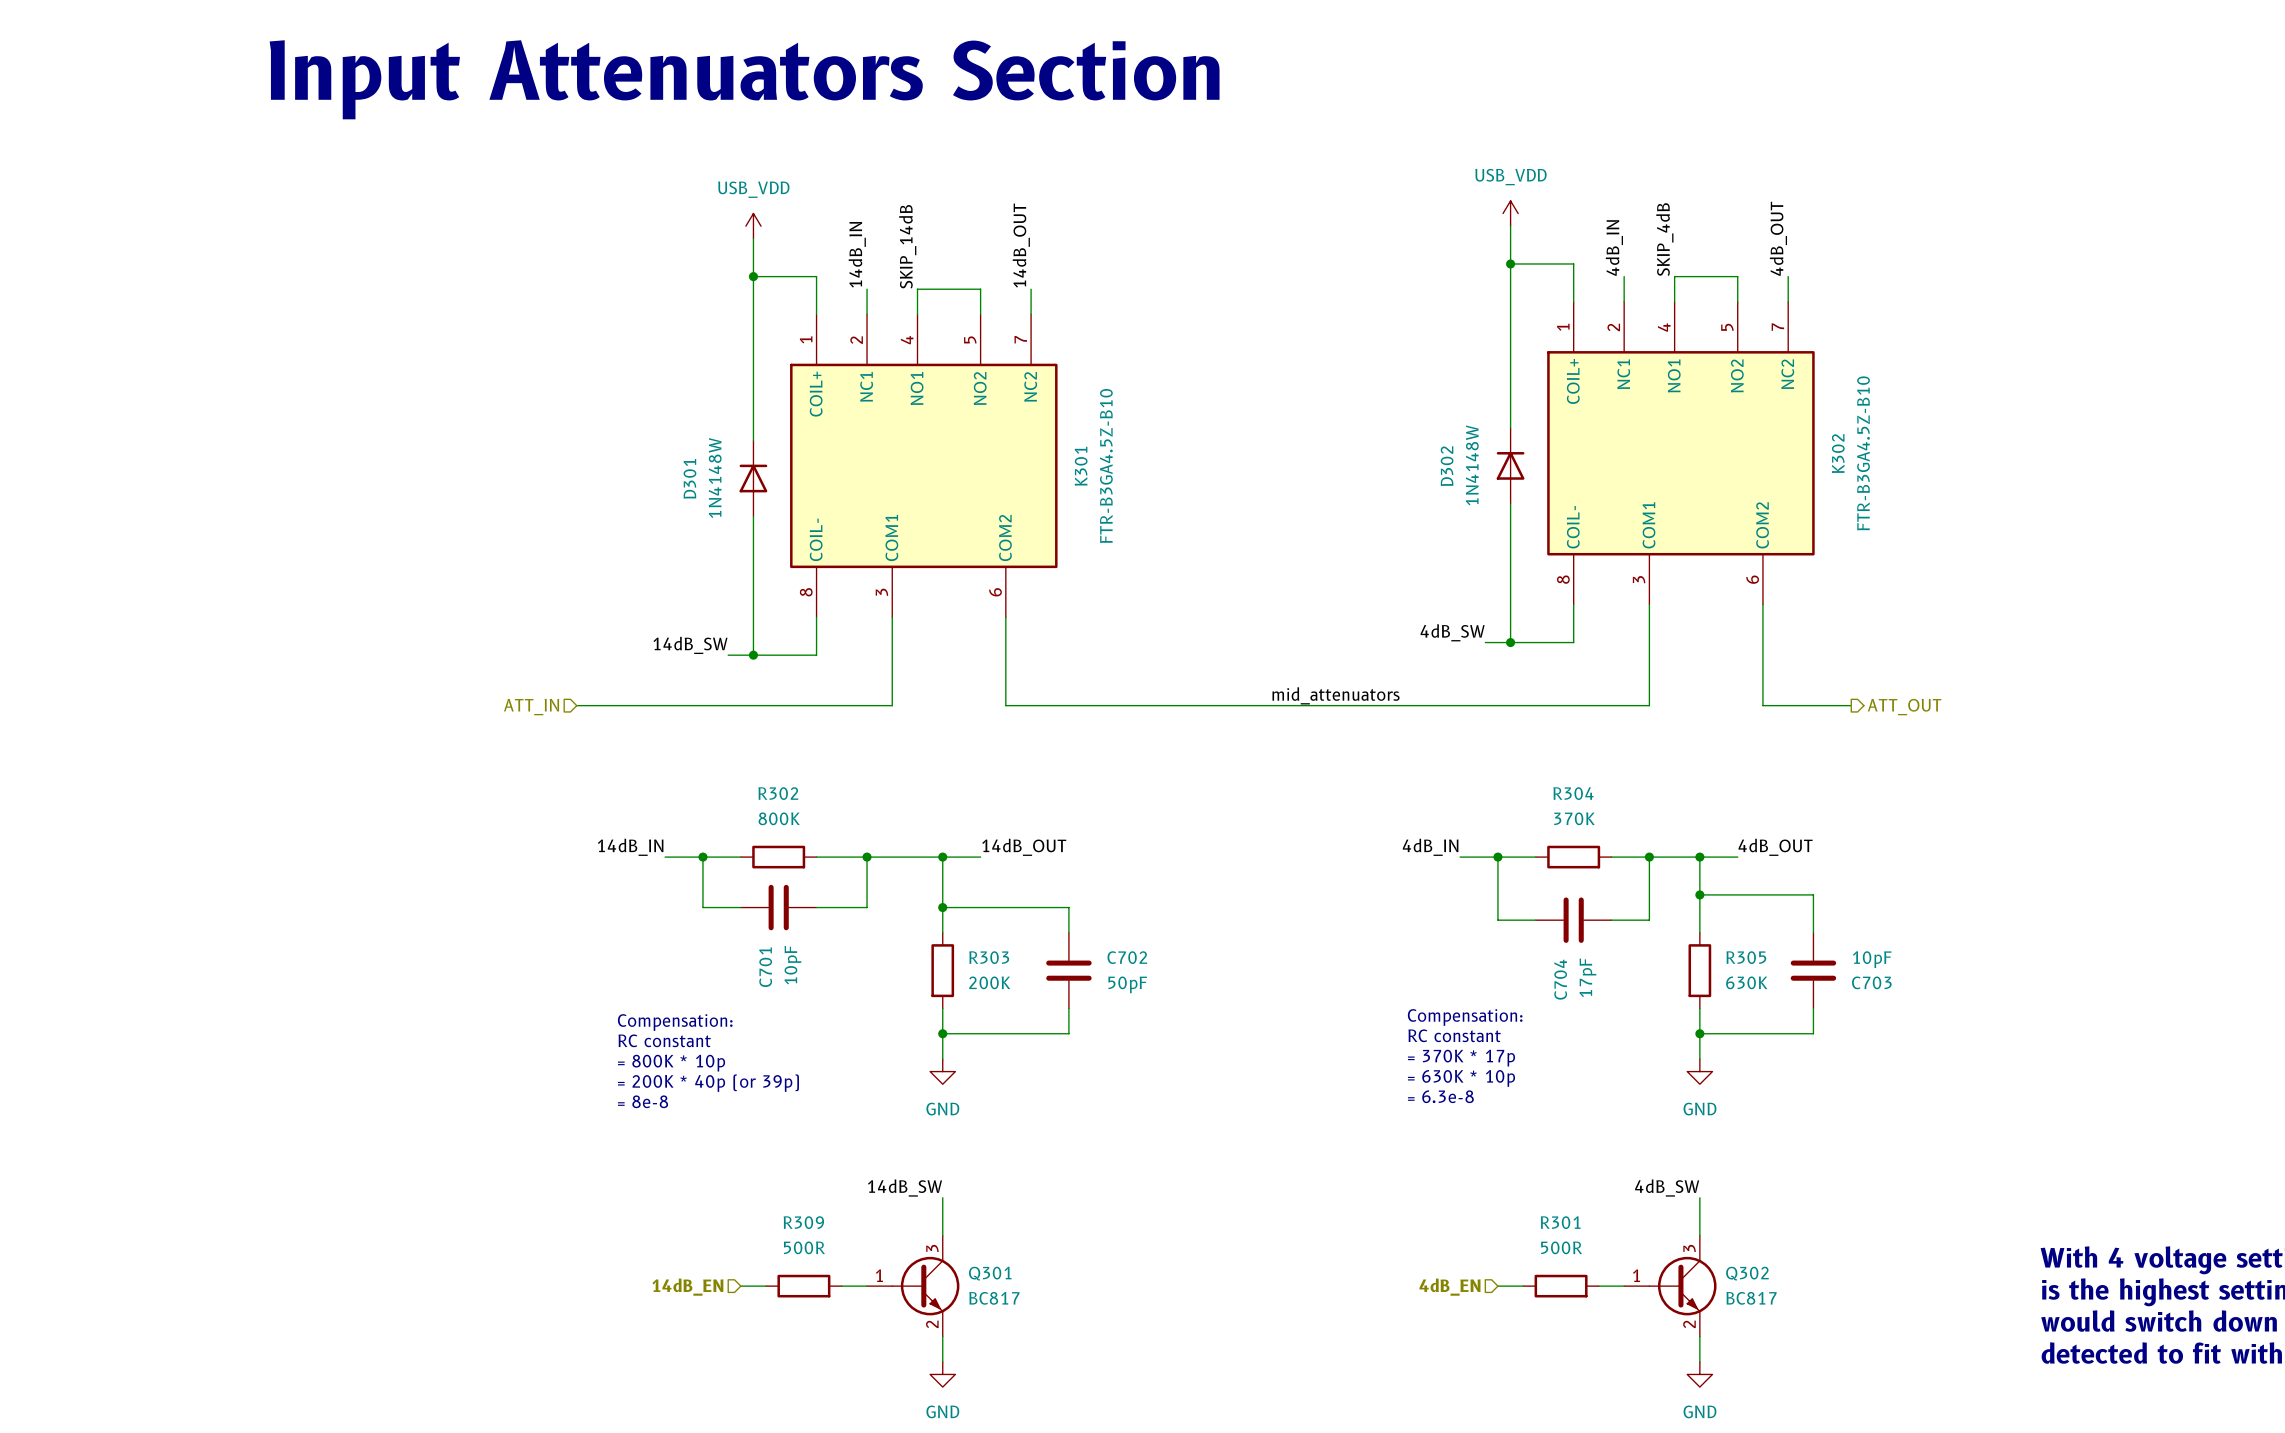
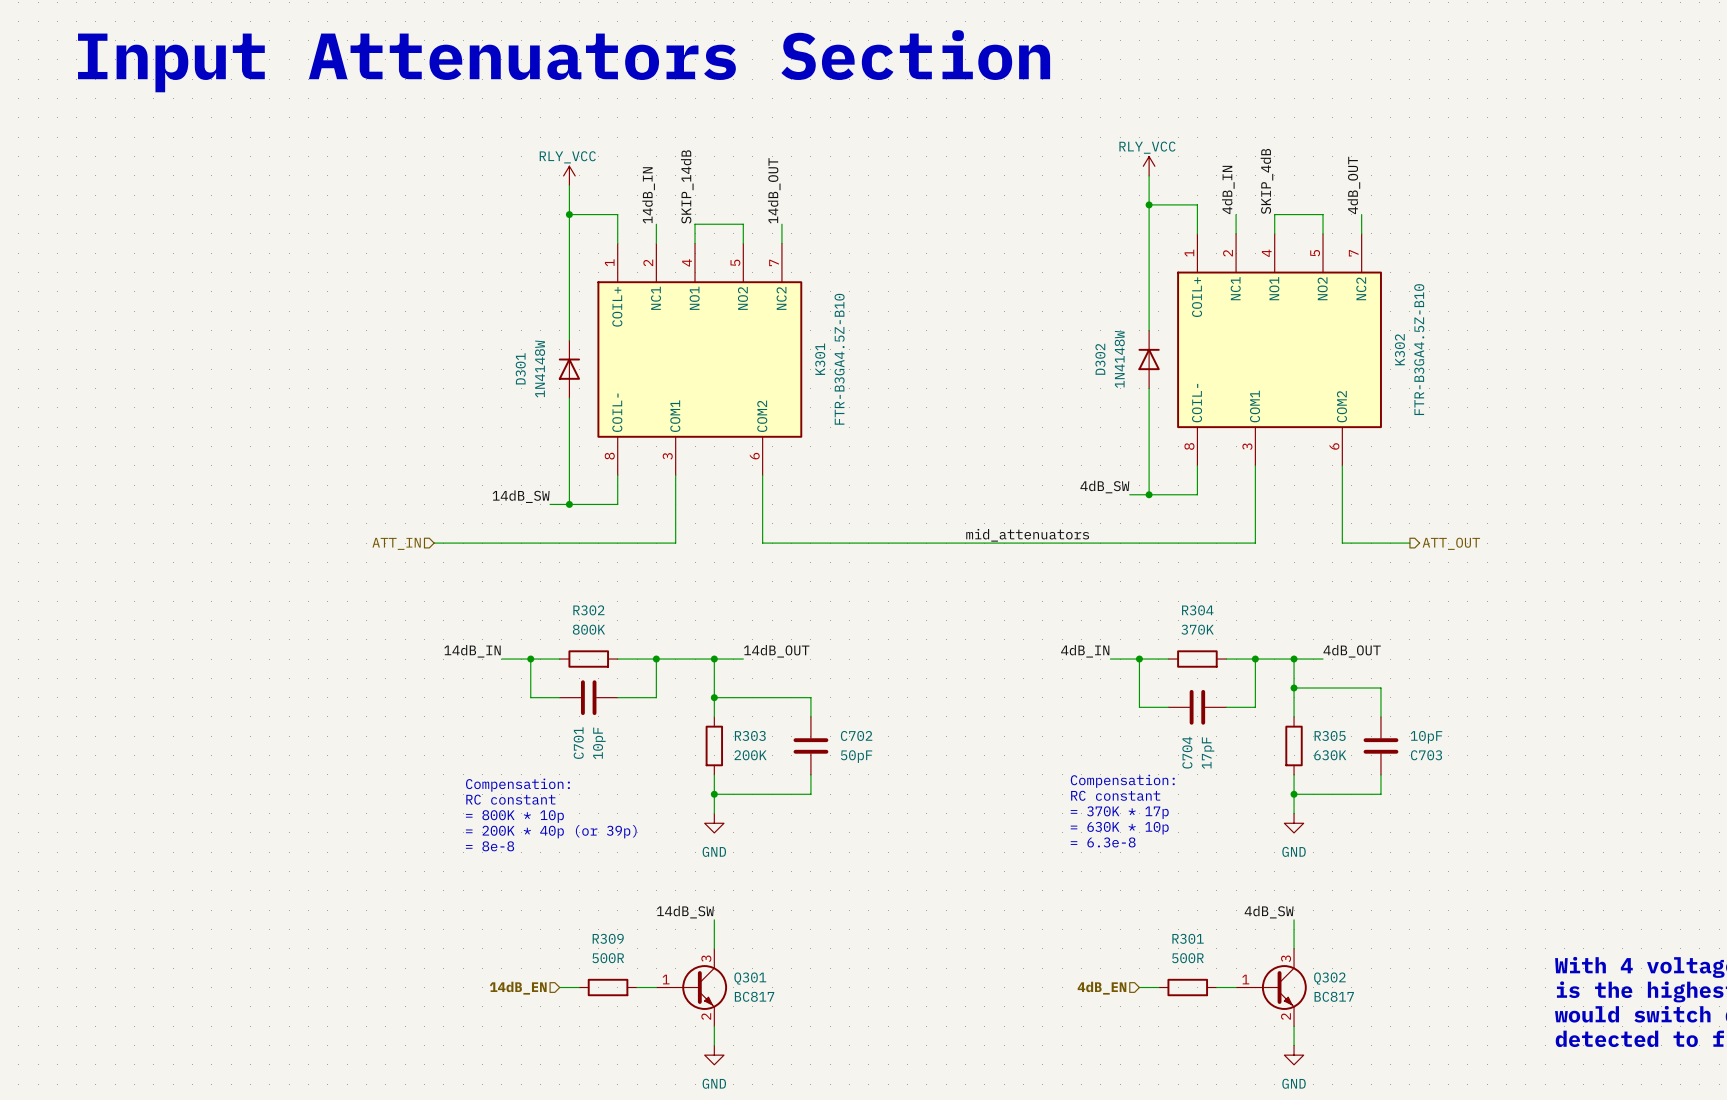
power symbol: USB_VDD (1510, 213) -> RLY_VCC (1149, 166)
power symbol: USB_VDD (753, 226) -> RLY_VCC (569, 175)

